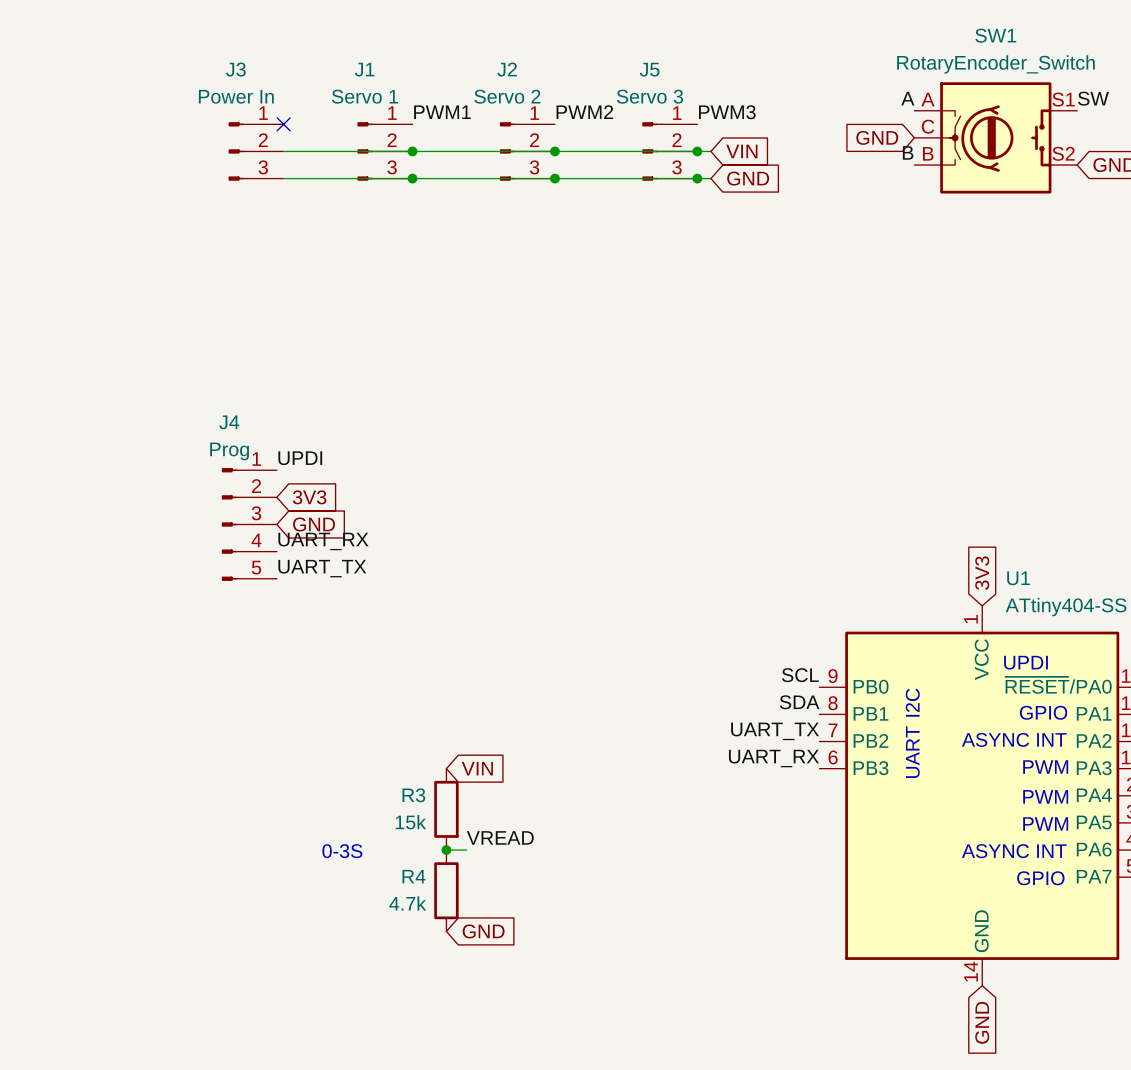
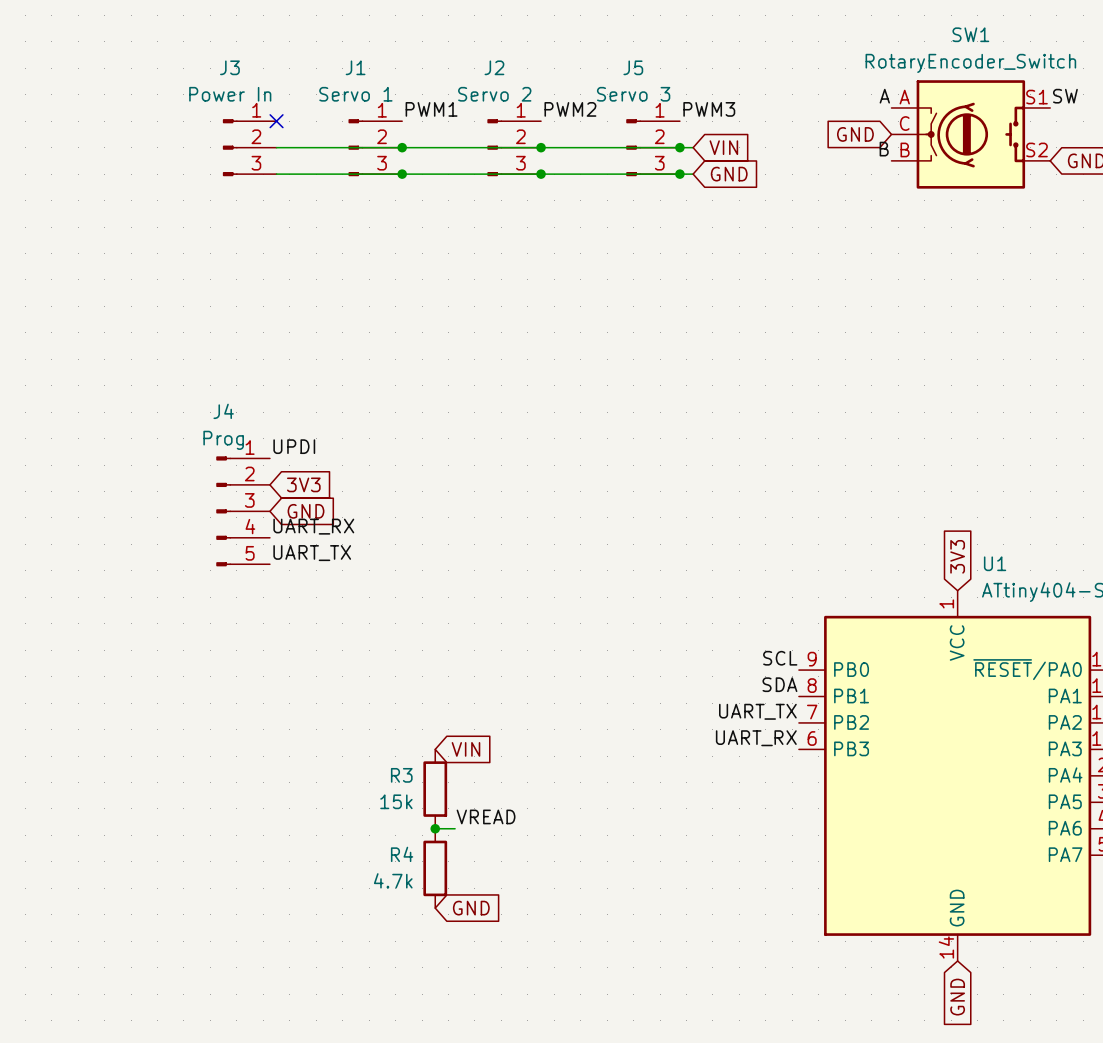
text: UPDI (1025, 662) -> none
text: I2C (912, 702) -> none
text: GPIO (1043, 712) -> none
text: ASYNC INT (1014, 739) -> none
text: UART (912, 752) -> none
text: PWM (1045, 767) -> none
text: PWM (1045, 796) -> none
text: PWM (1045, 824) -> none
text: 0-3S (342, 851) -> none
text: ASYNC INT (1014, 851) -> none
text: GPIO (1040, 878) -> none

